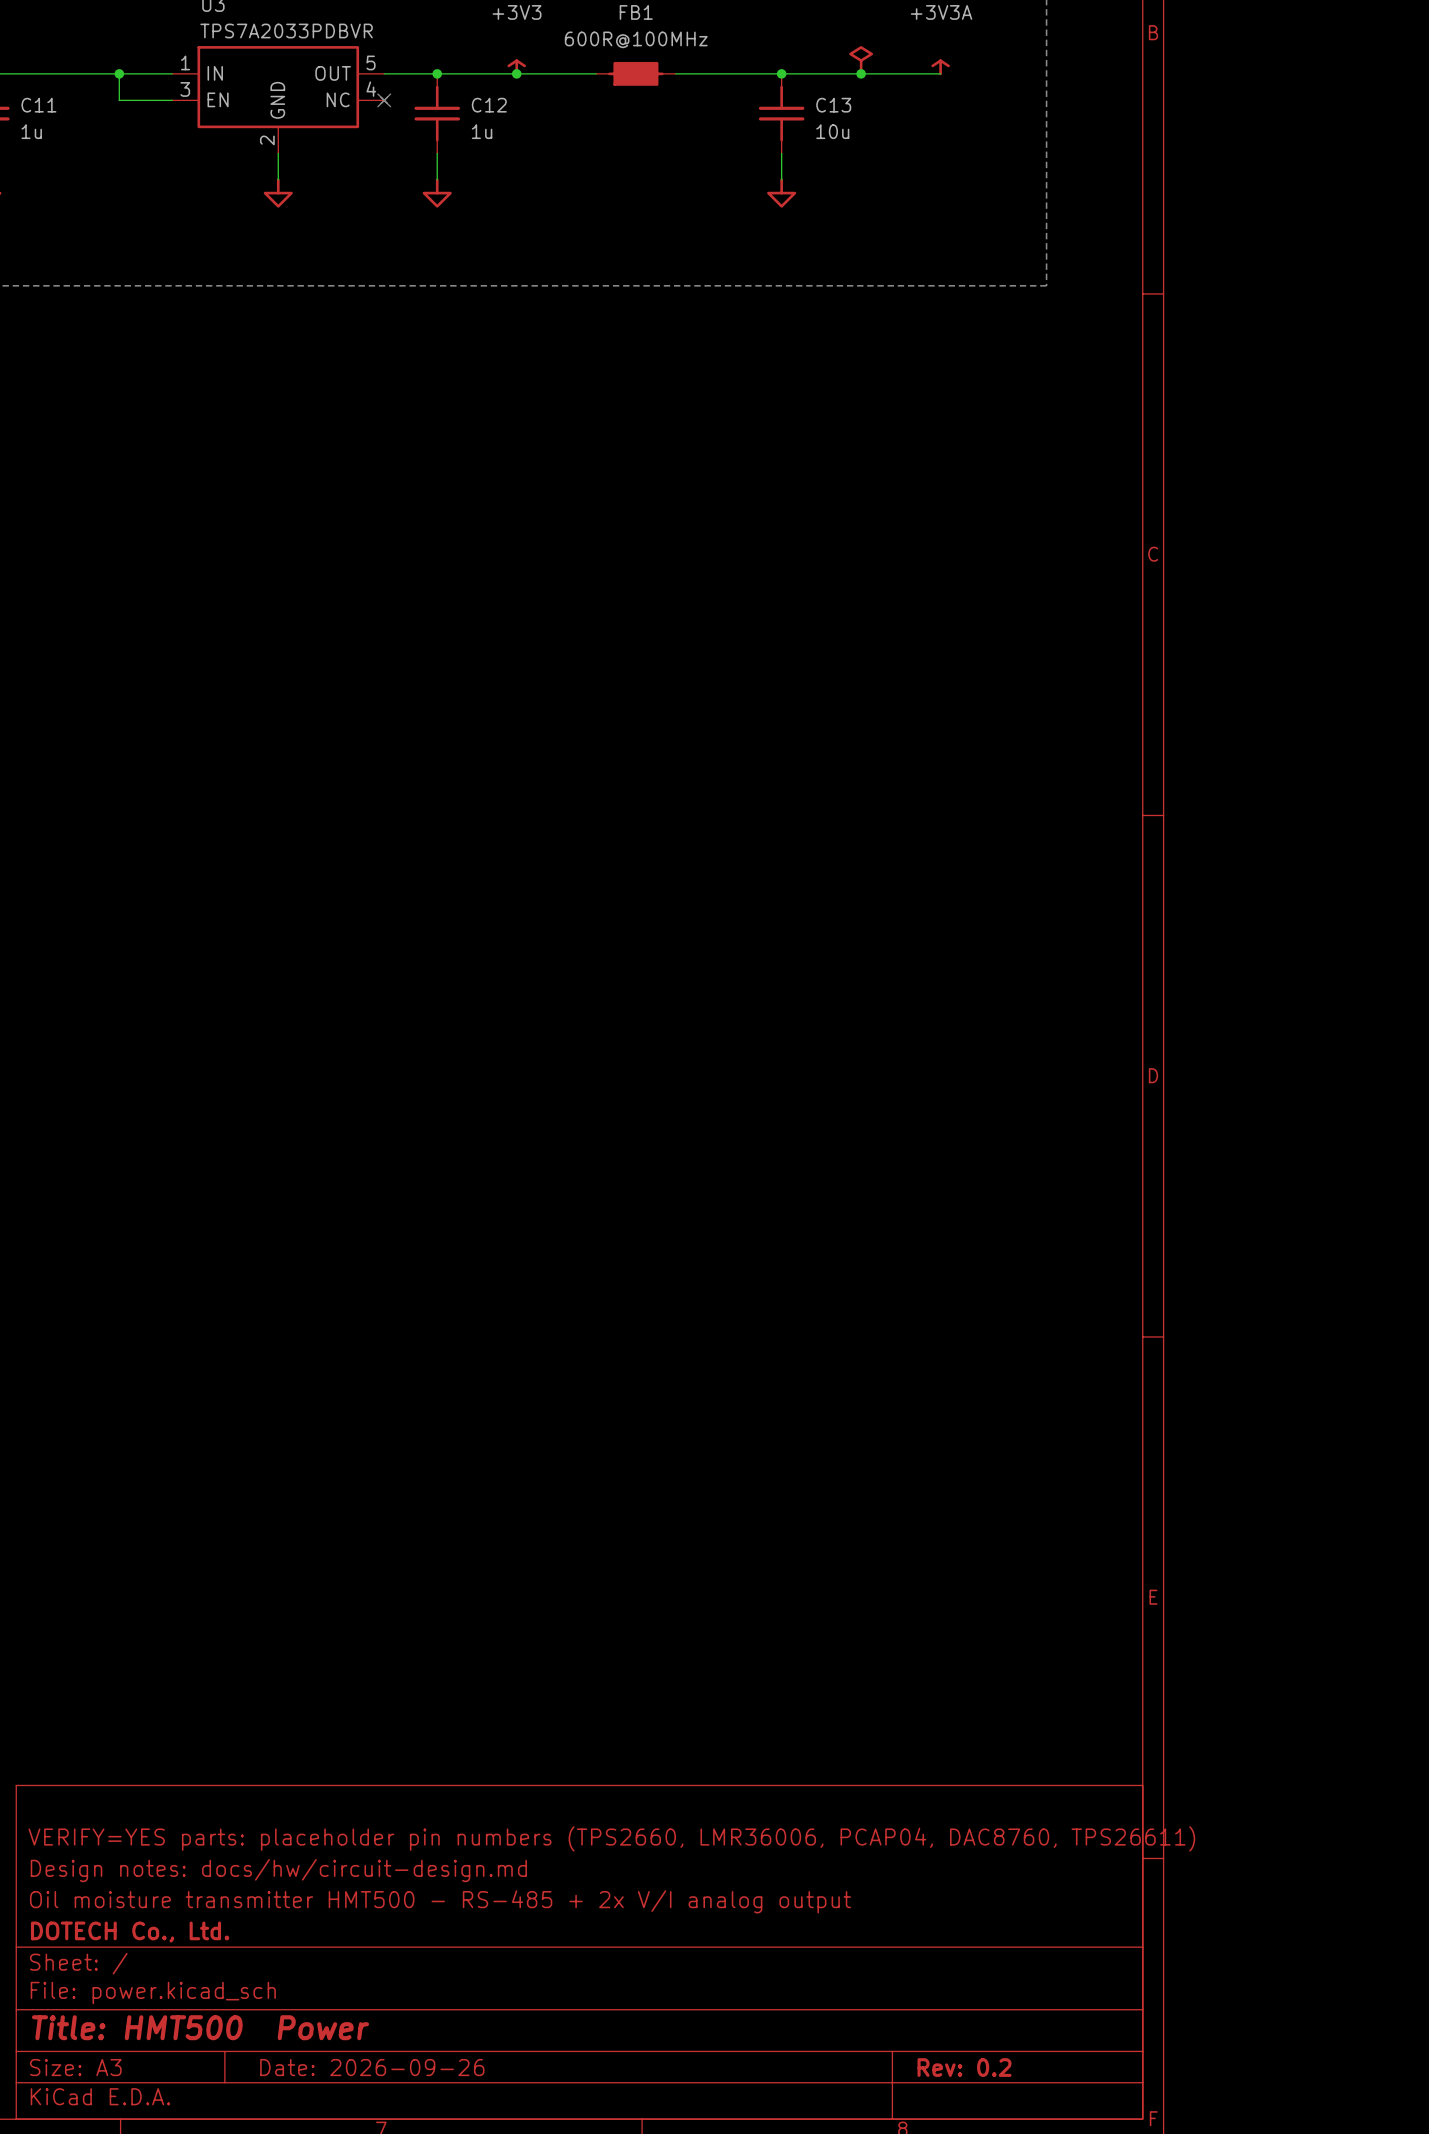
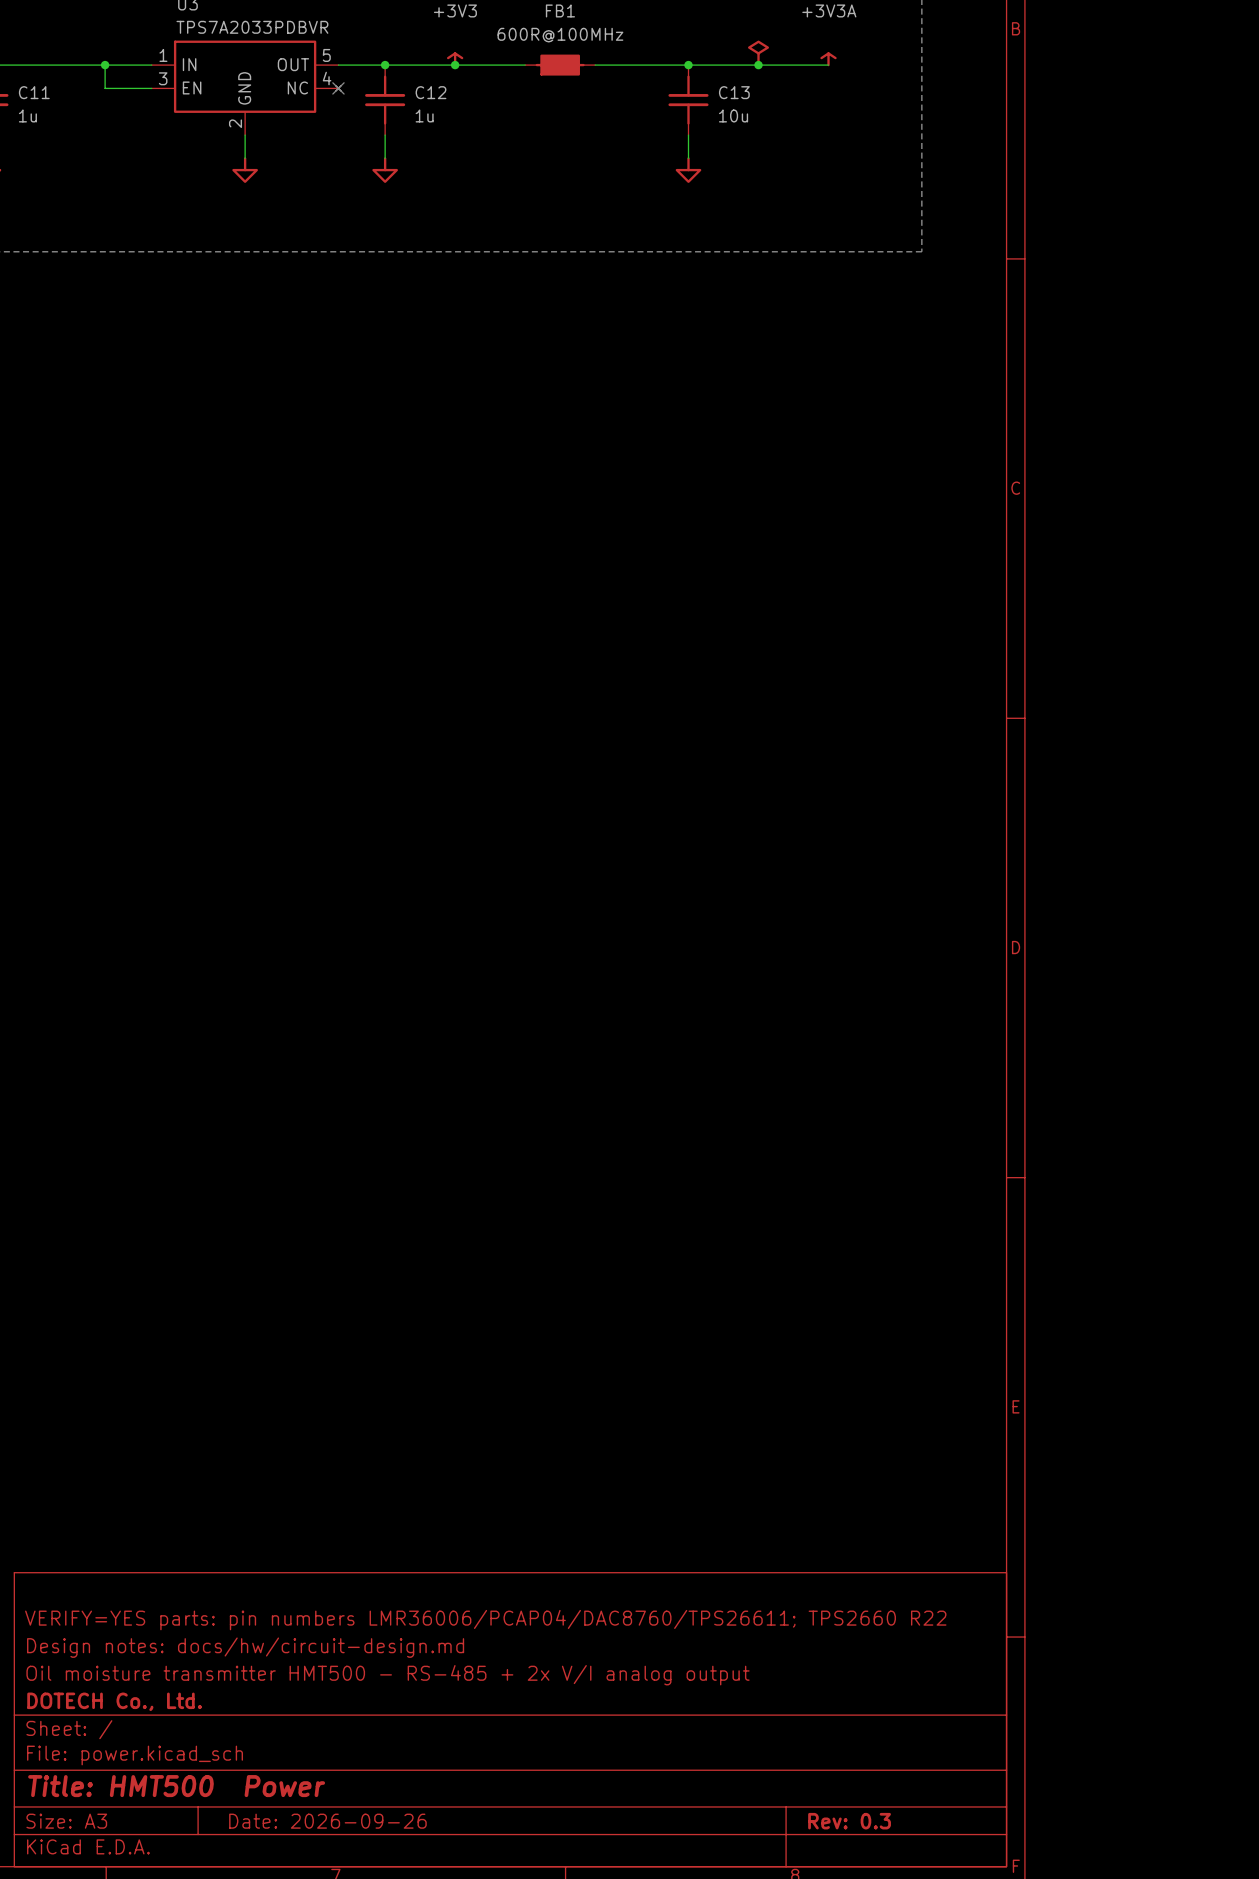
title block: VERIFY=YES parts: placeholder pin numbers (TPS2660, LMR36006, PCAP04, DAC8760, TPS26611) (611, 1838) -> VERIFY=YES parts: pin numbers LMR36006/PCAP04/DAC8760/TPS26611; TPS2660 R22 (485, 1620)
title block: Rev: 0.2 (964, 2067) -> Rev: 0.3 (849, 1821)

